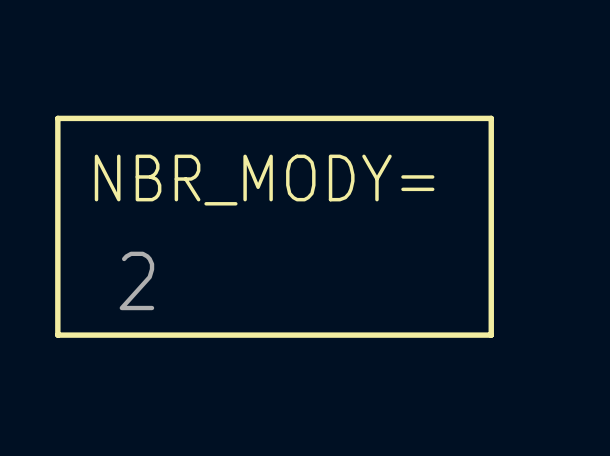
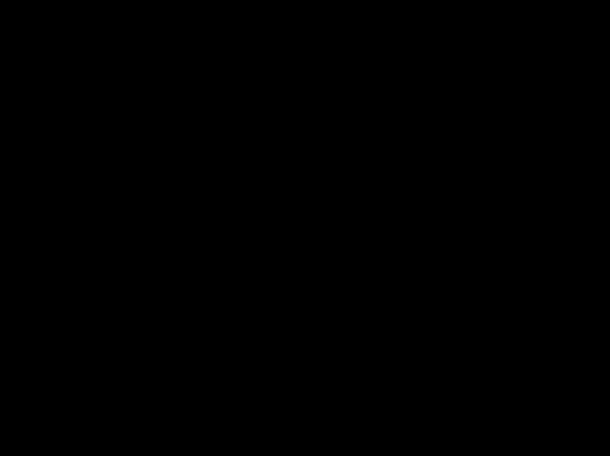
drawing: [55, 115, 494, 338] -> none

